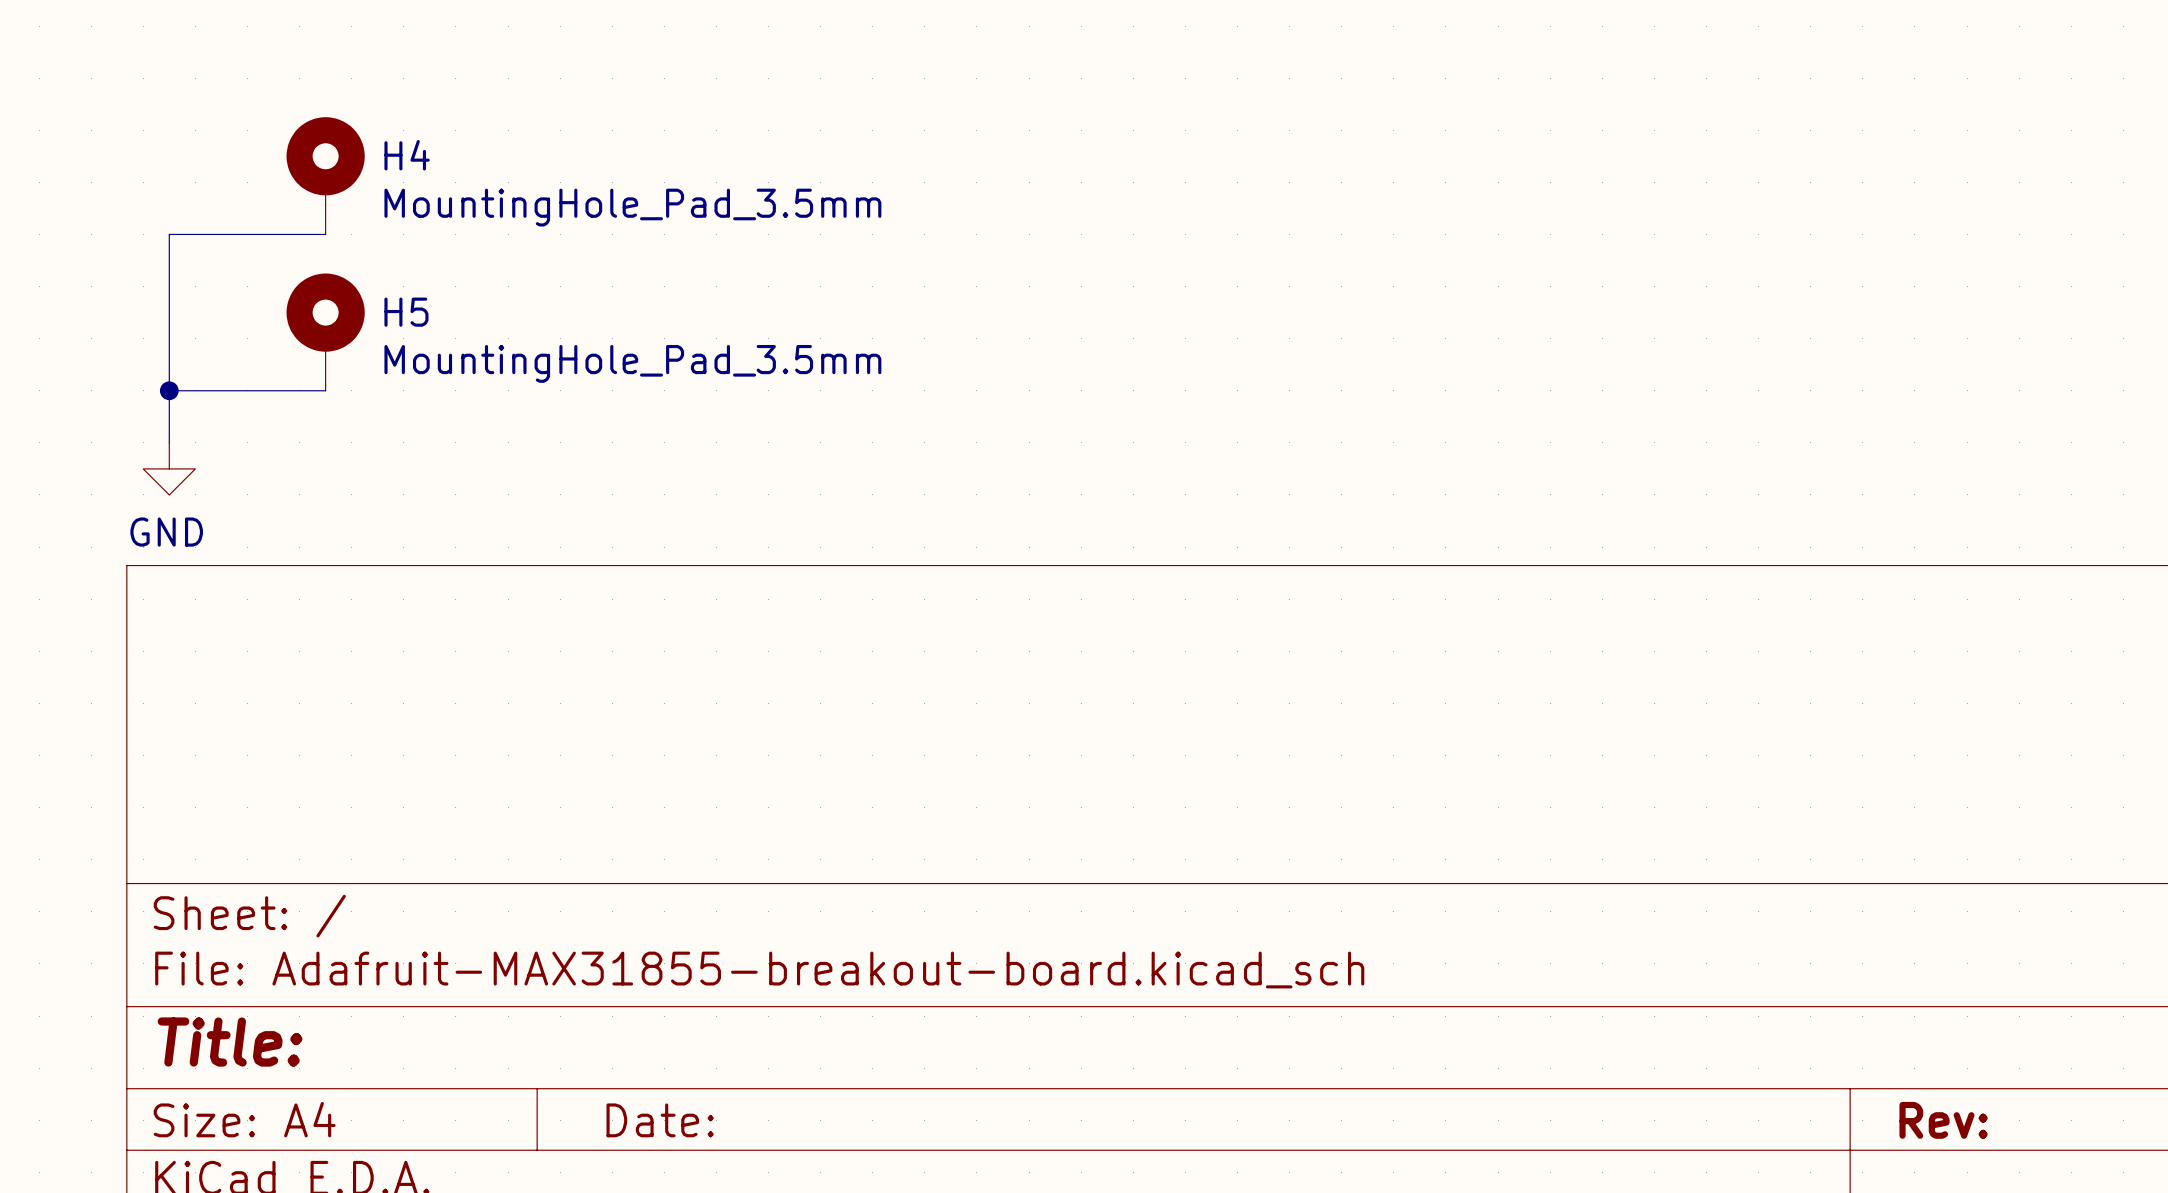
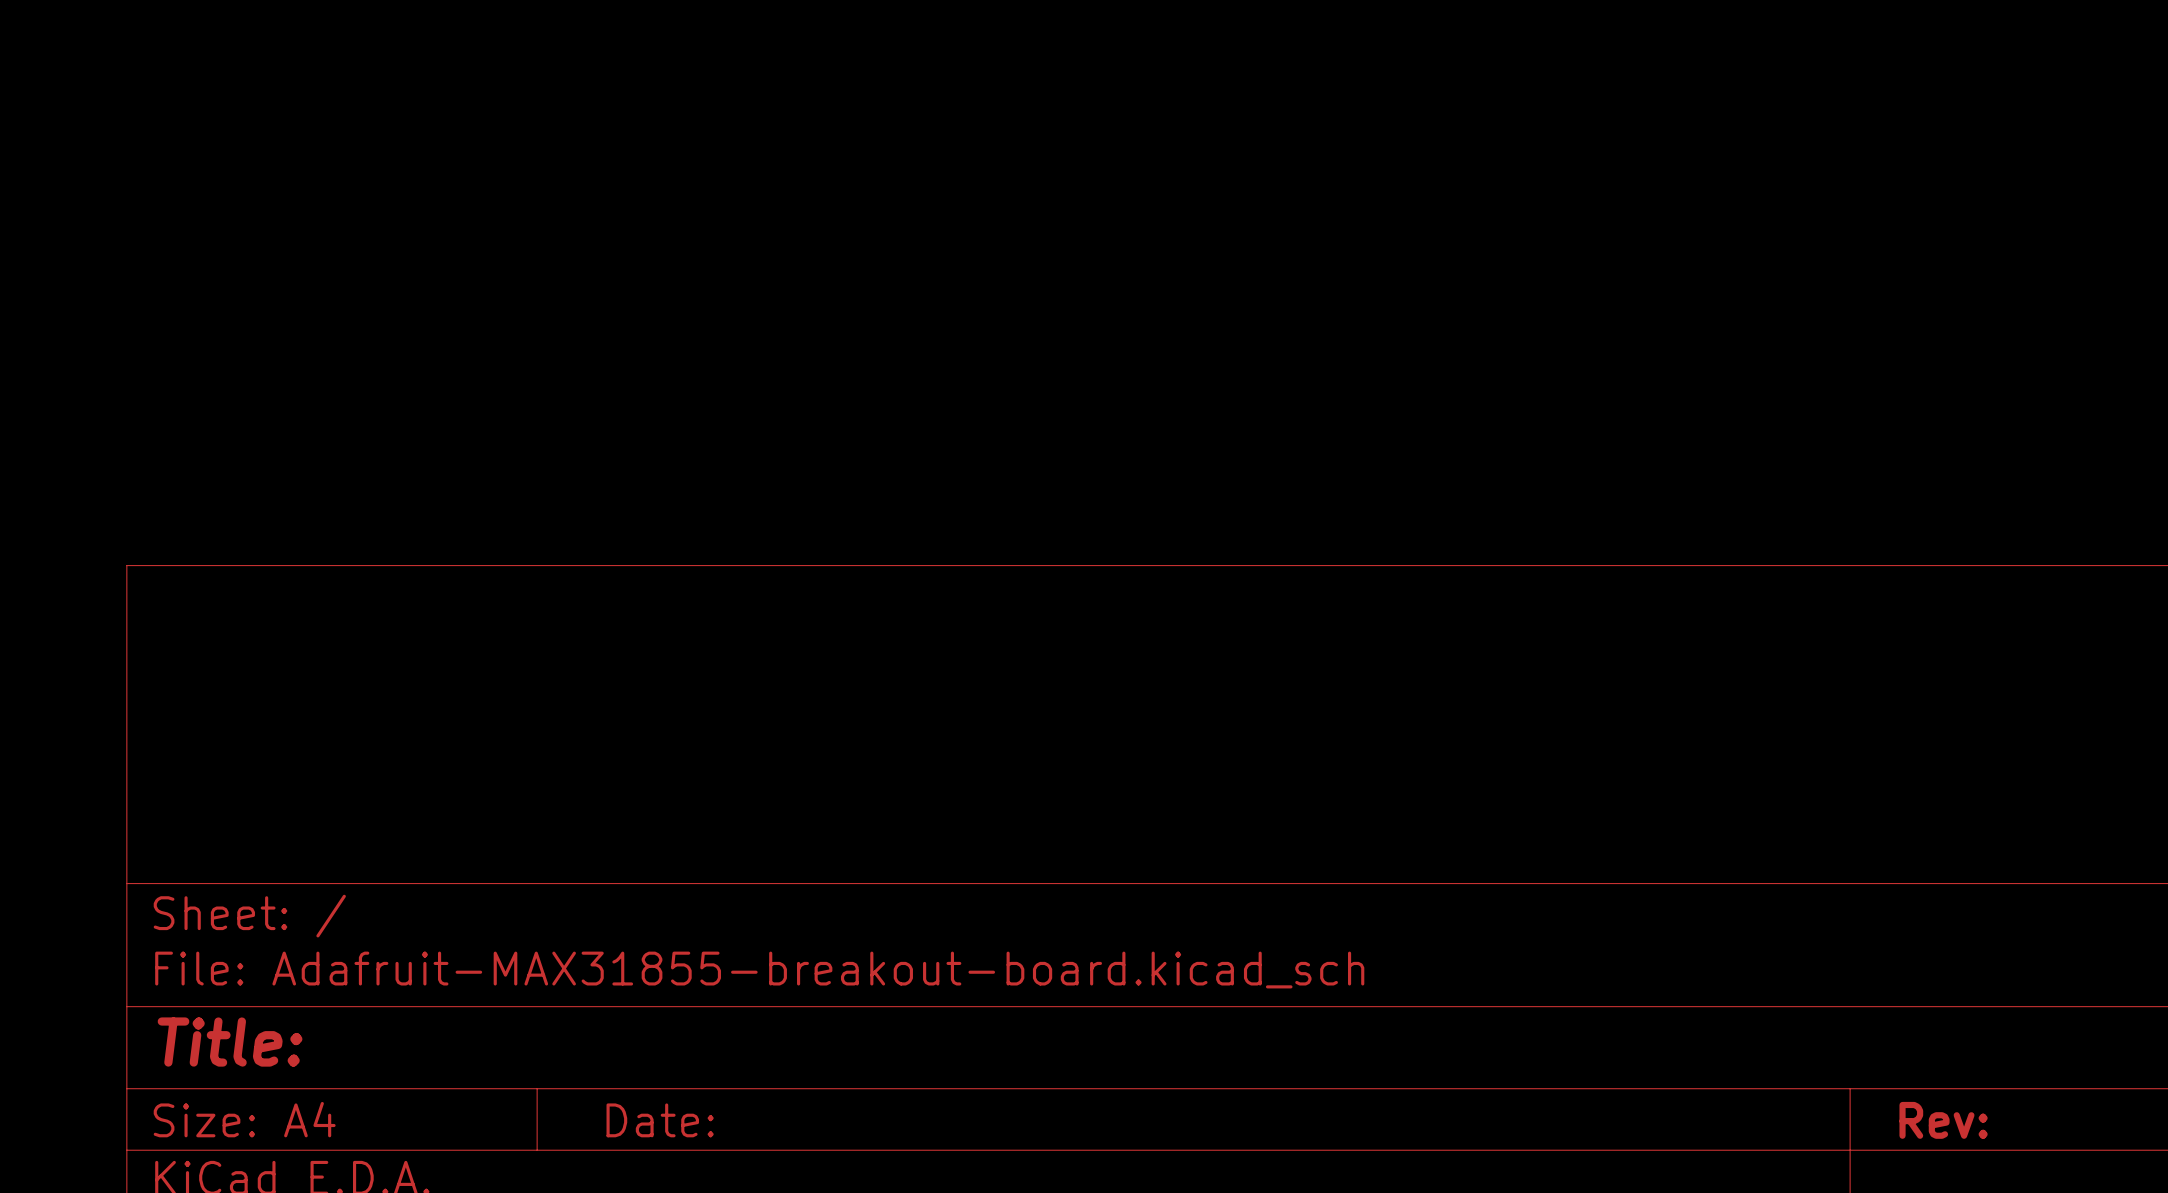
H4: MountingHole_Pad_3.5mm (325, 175) -> none
wire: (325, 234) (169, 234) (169, 442) -> none
H5: MountingHole_Pad_3.5mm (325, 332) -> none
wire: (169, 390) (325, 390) -> none
junction: (169, 390) -> none
power symbol: GND (169, 468) -> none

